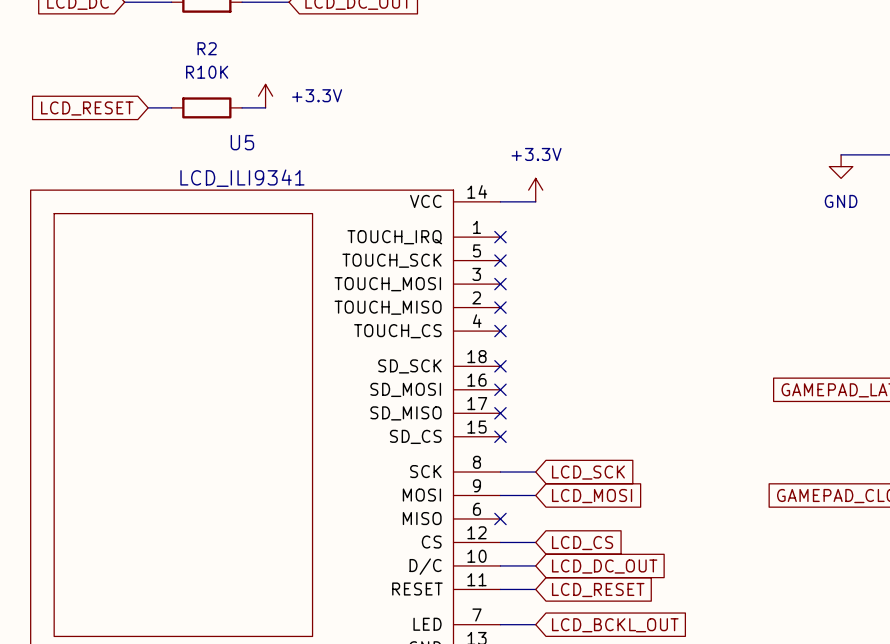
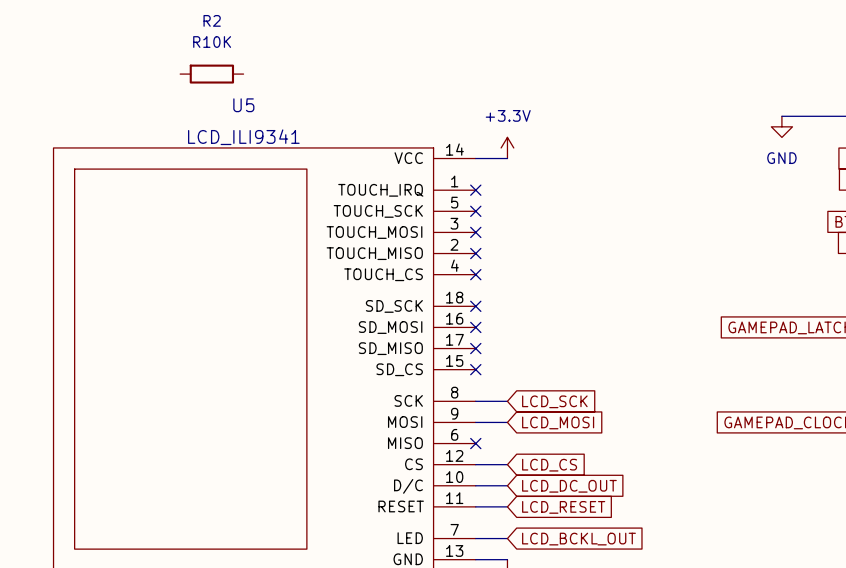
power symbol: +3.3V (265, 96) -> none
wire: (148, 107) (171, 107) -> none
wire: (242, 107) (265, 107) -> none
global label: LCD_RESET (87, 108) -> none

